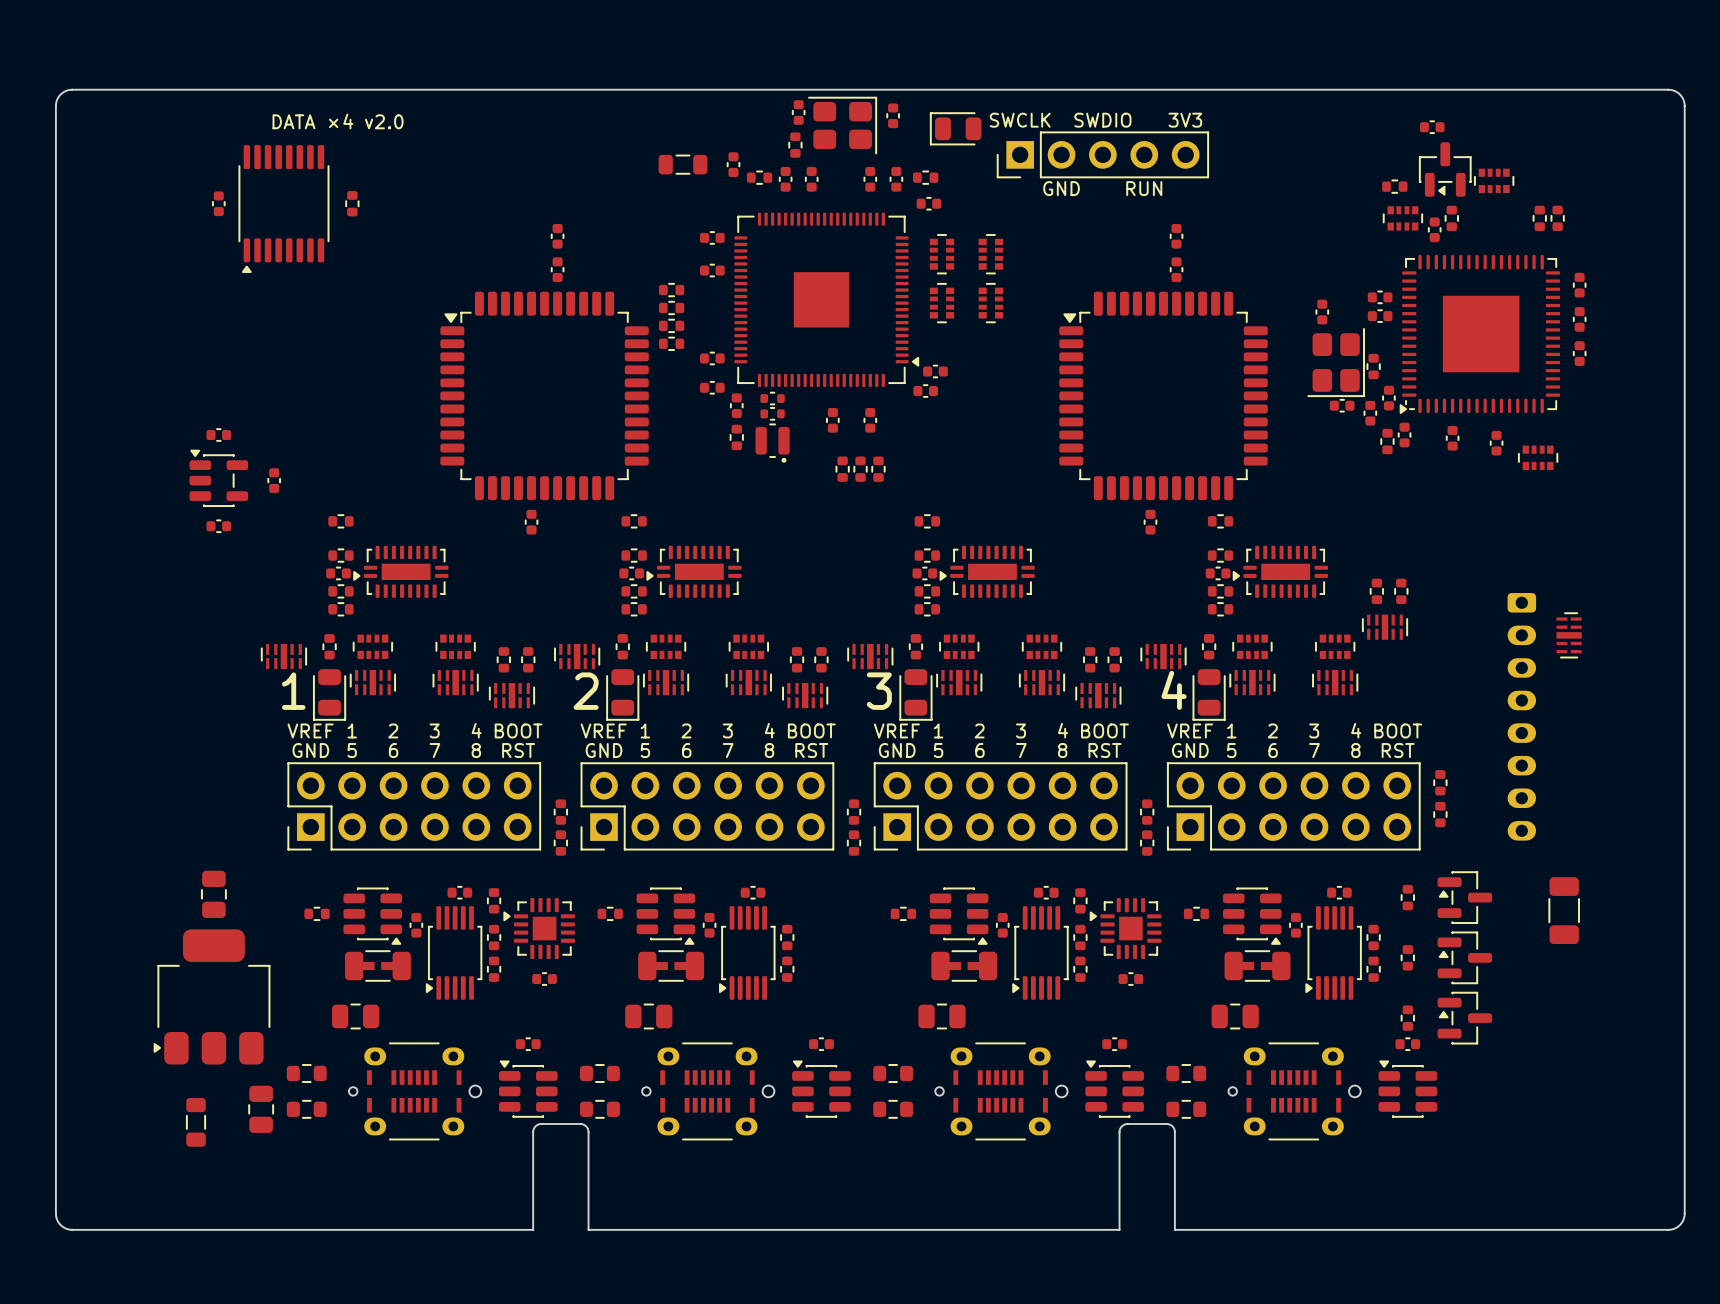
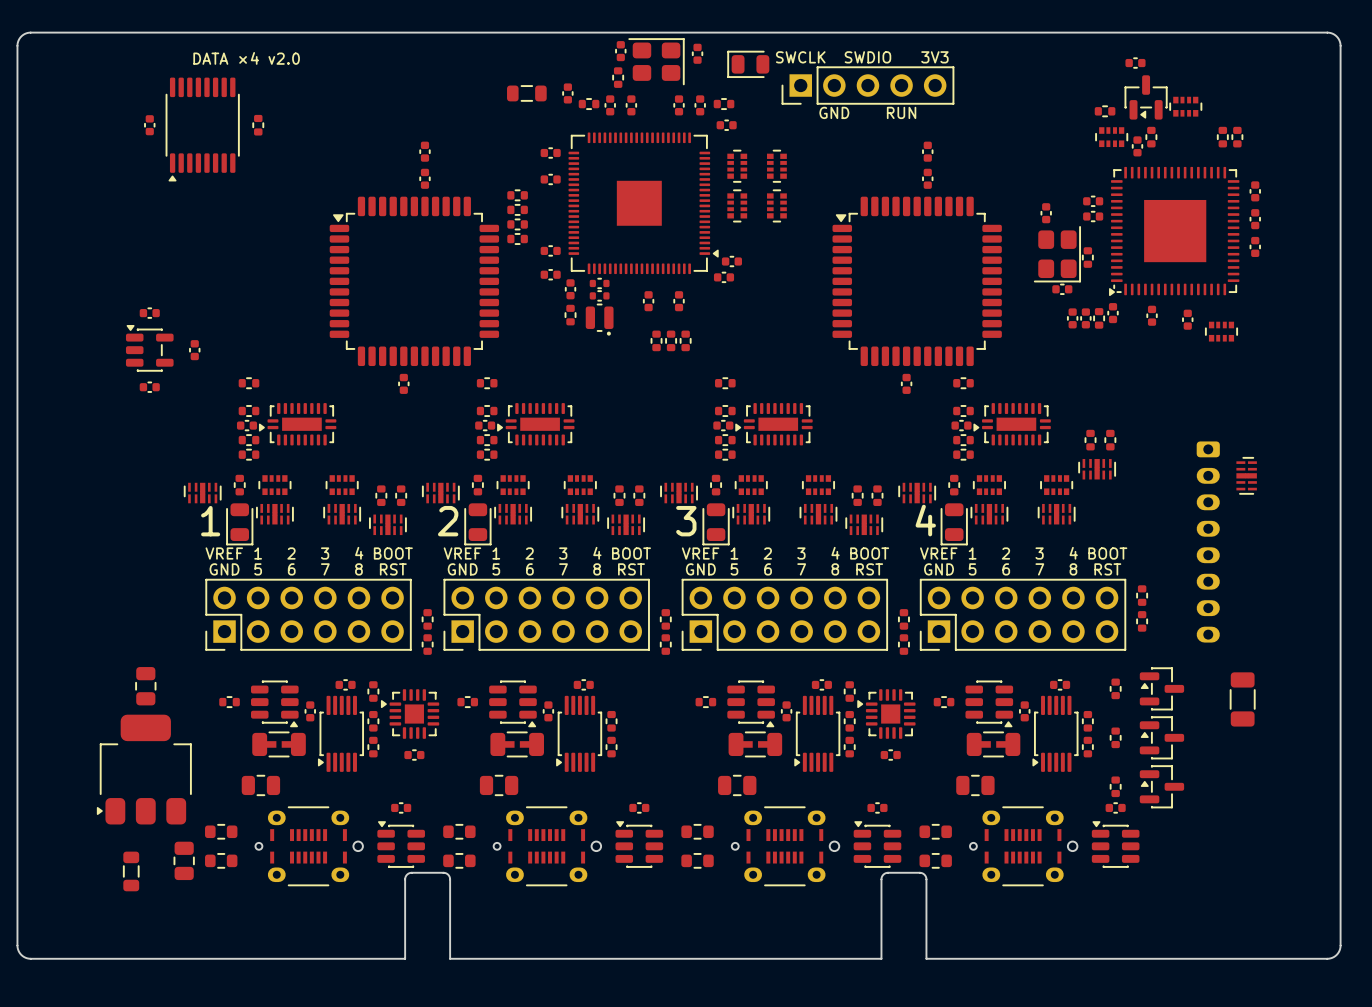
part: (1388, 398) -> none
part: (1370, 413) -> none
part: none -> (1072, 318)
part: none -> (1085, 318)

